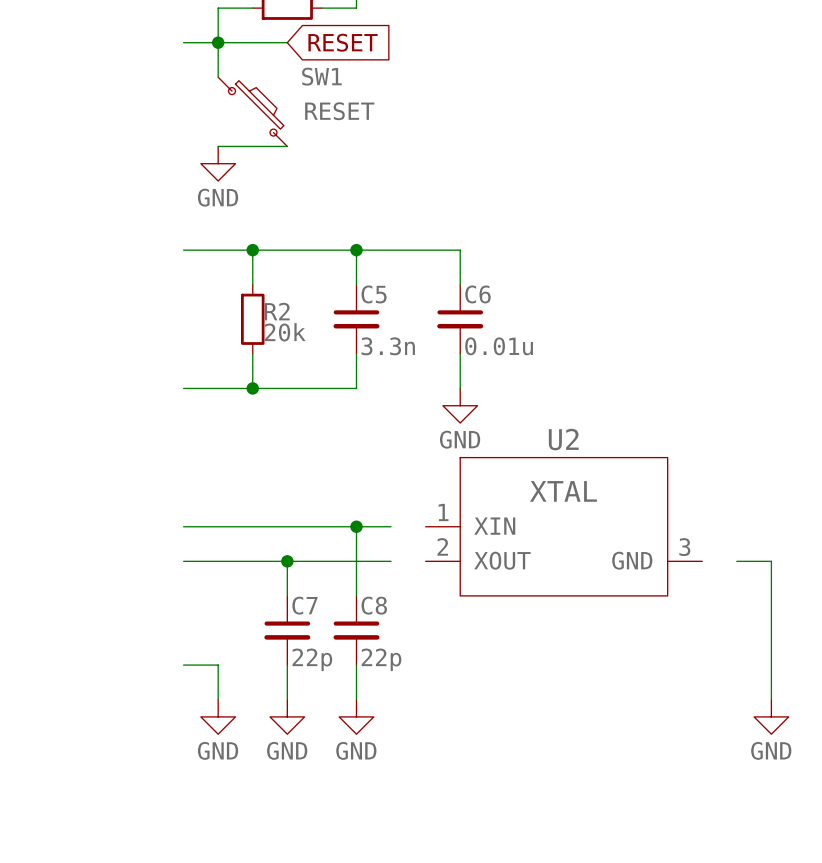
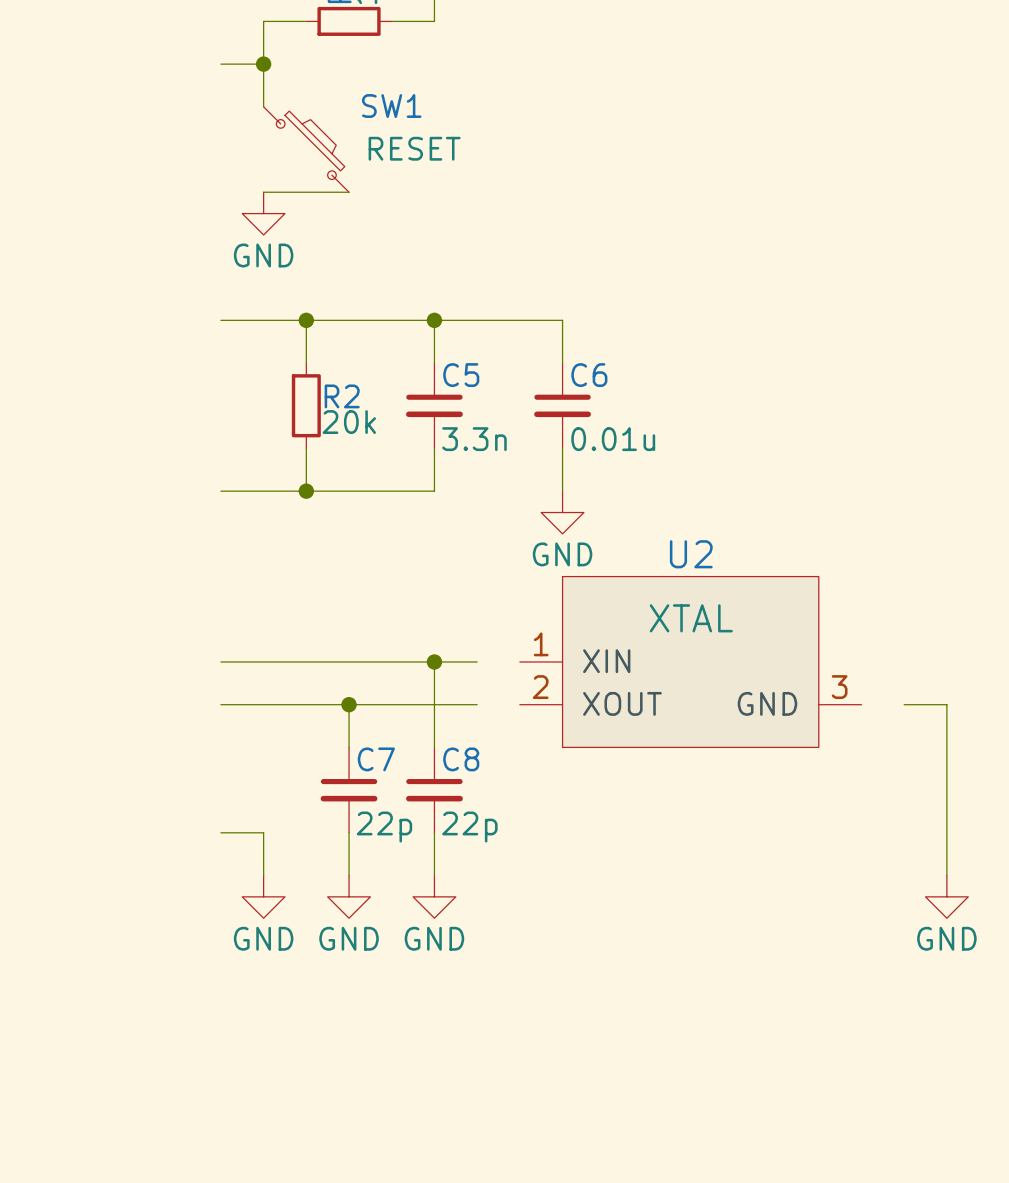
wire: (218, 42) (287, 42) -> none
global label: RESET (343, 42) -> none

